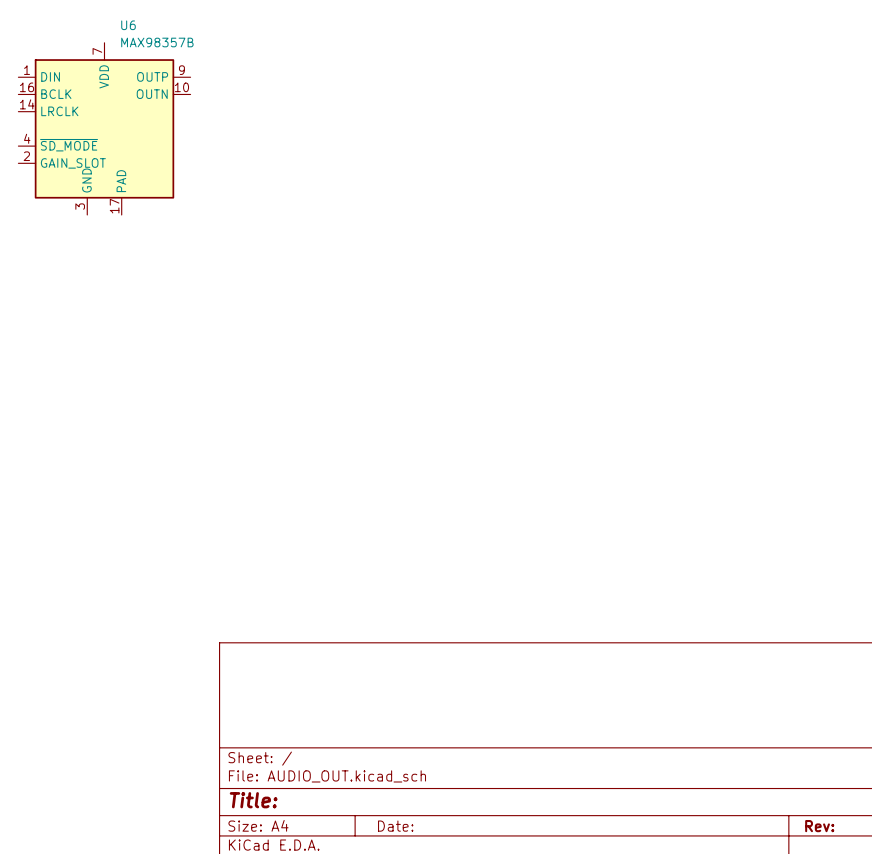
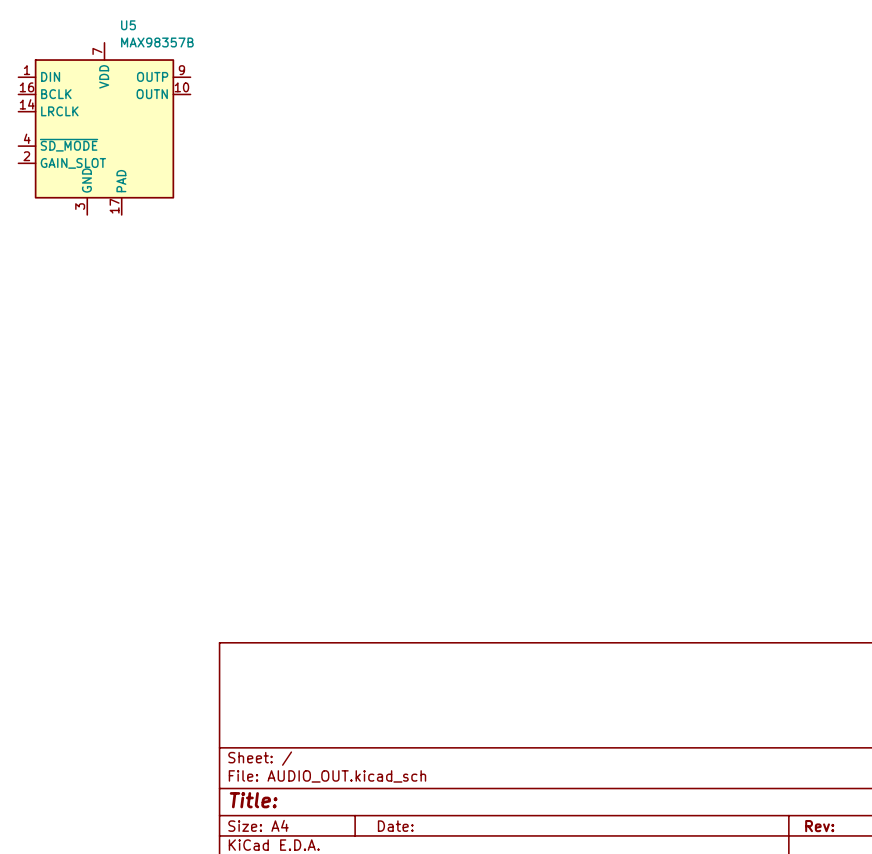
U6 name: U6 (128, 25) -> U5 (128, 25)

